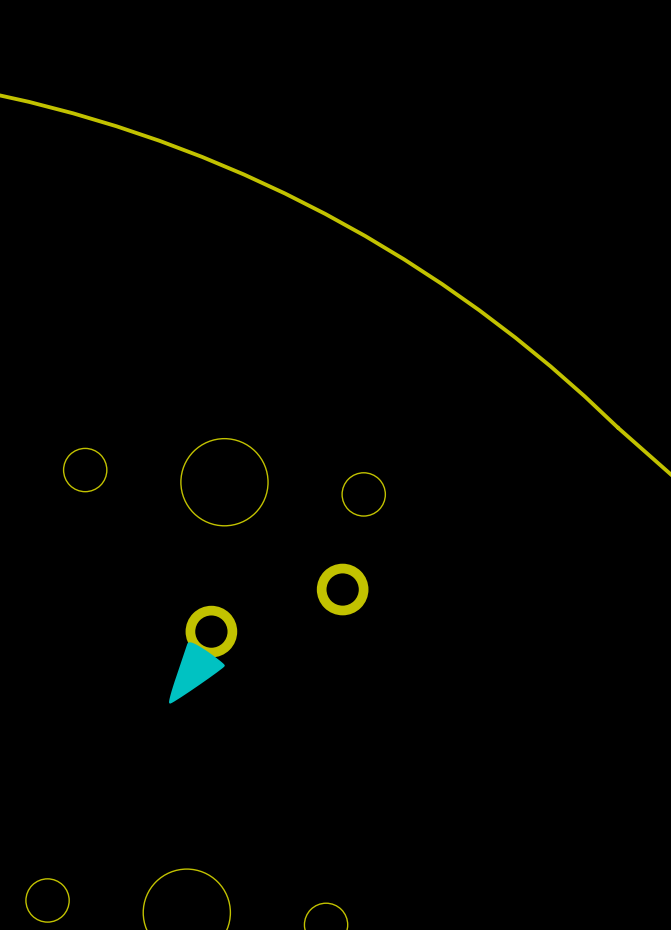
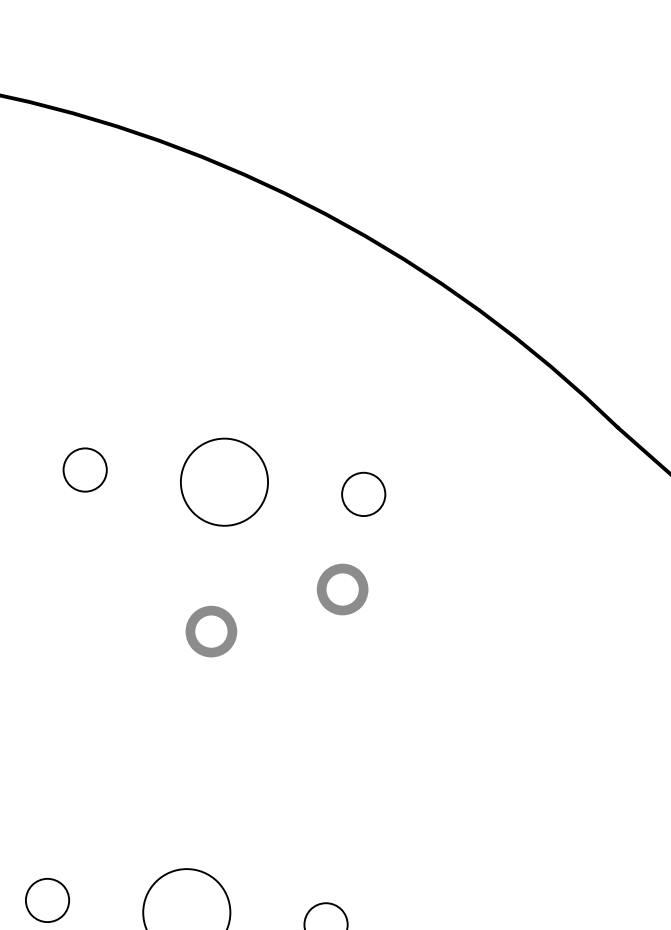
drawing: [169, 642, 225, 704] -> none

